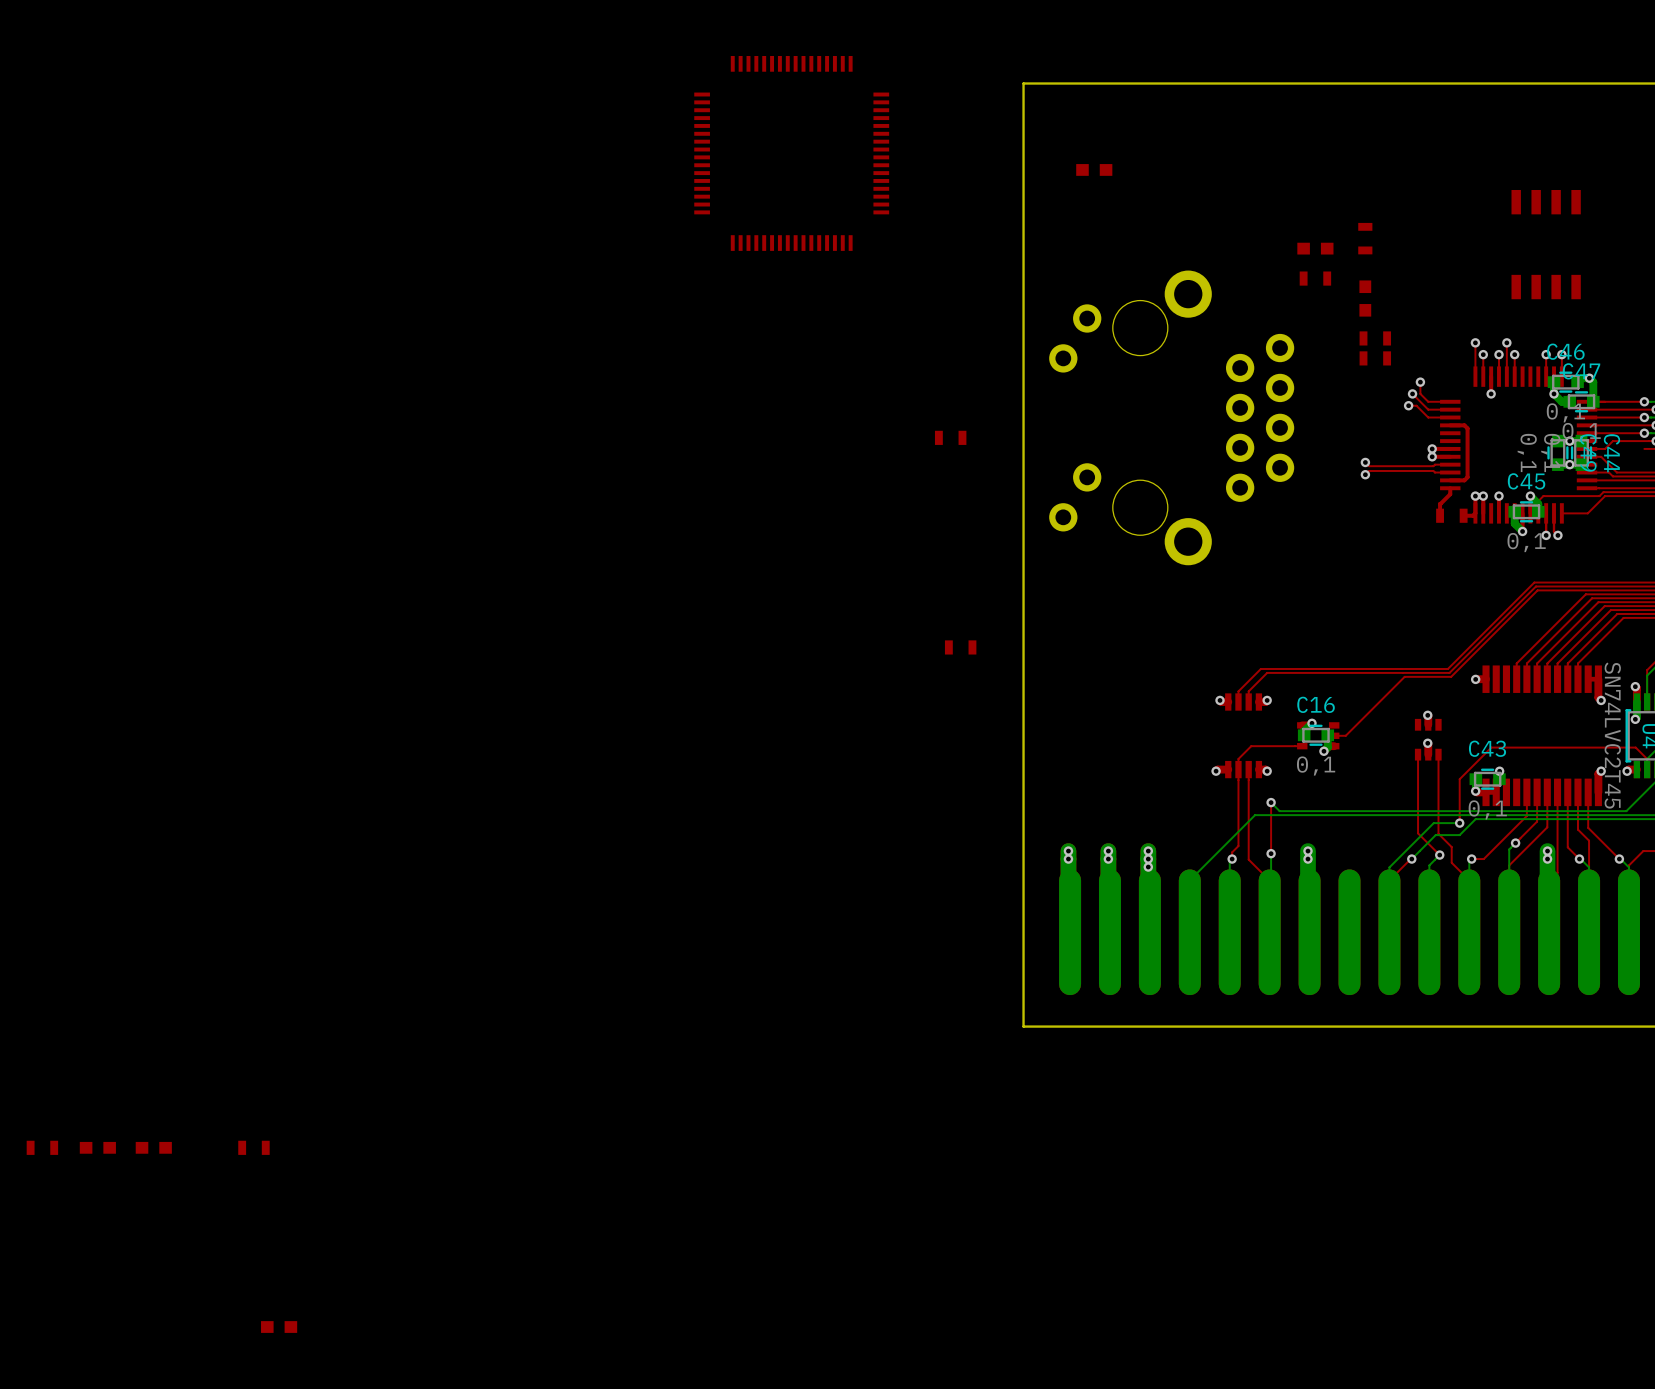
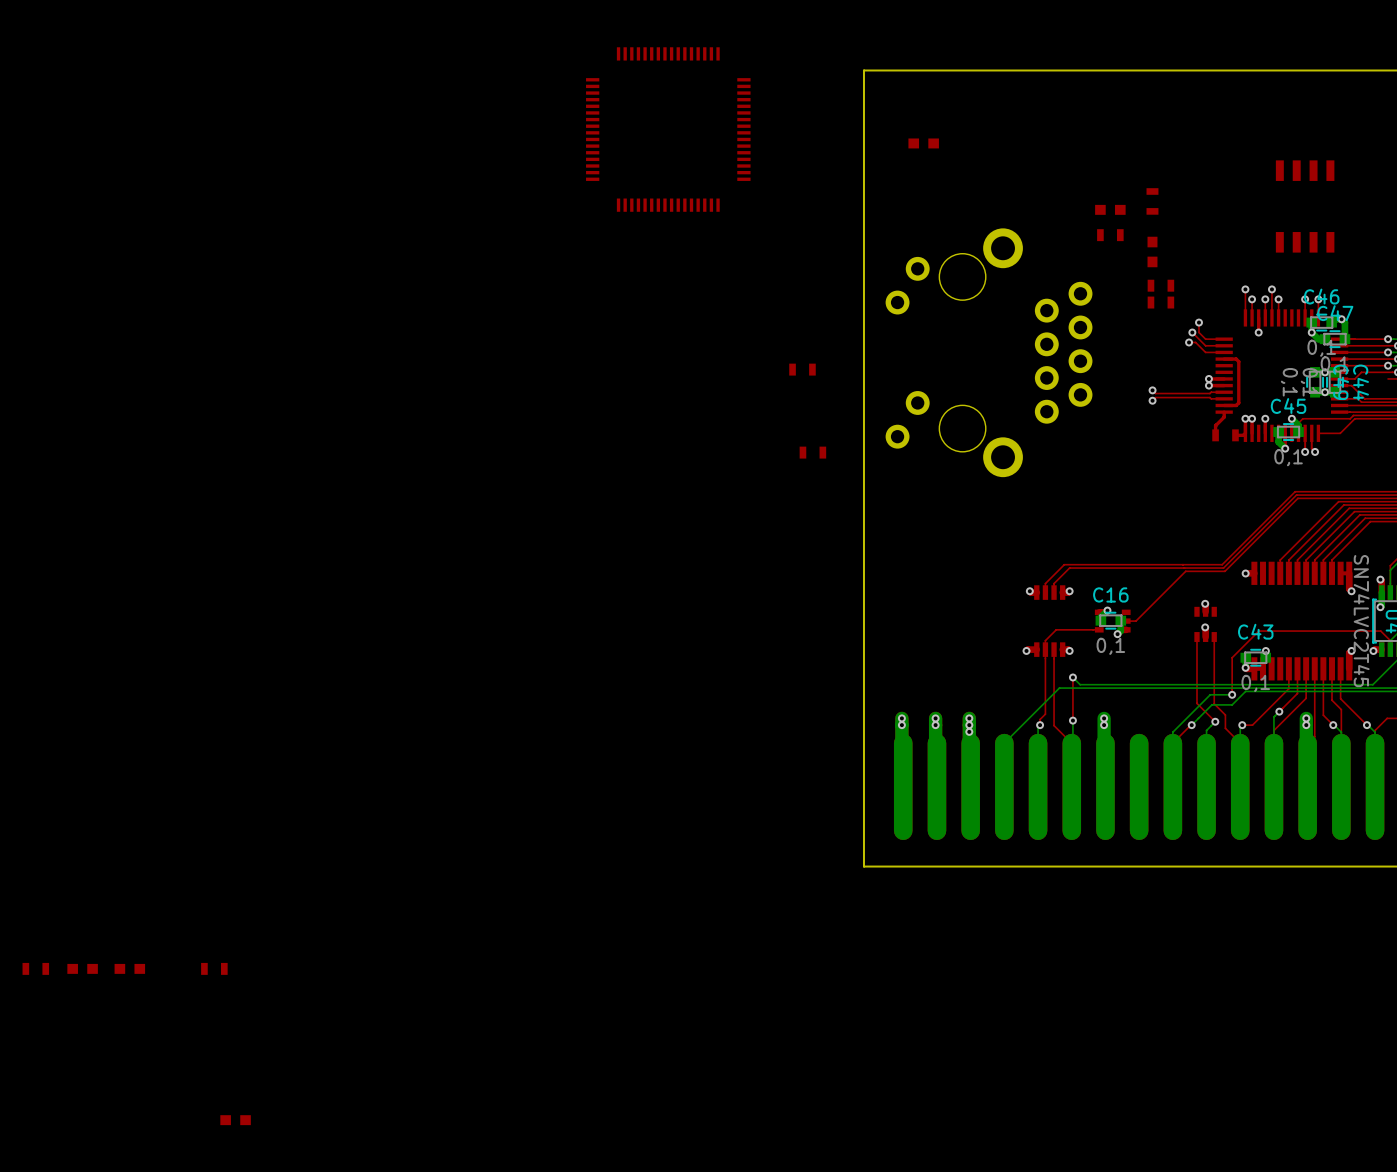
part position: (960, 647) -> (812, 452)

